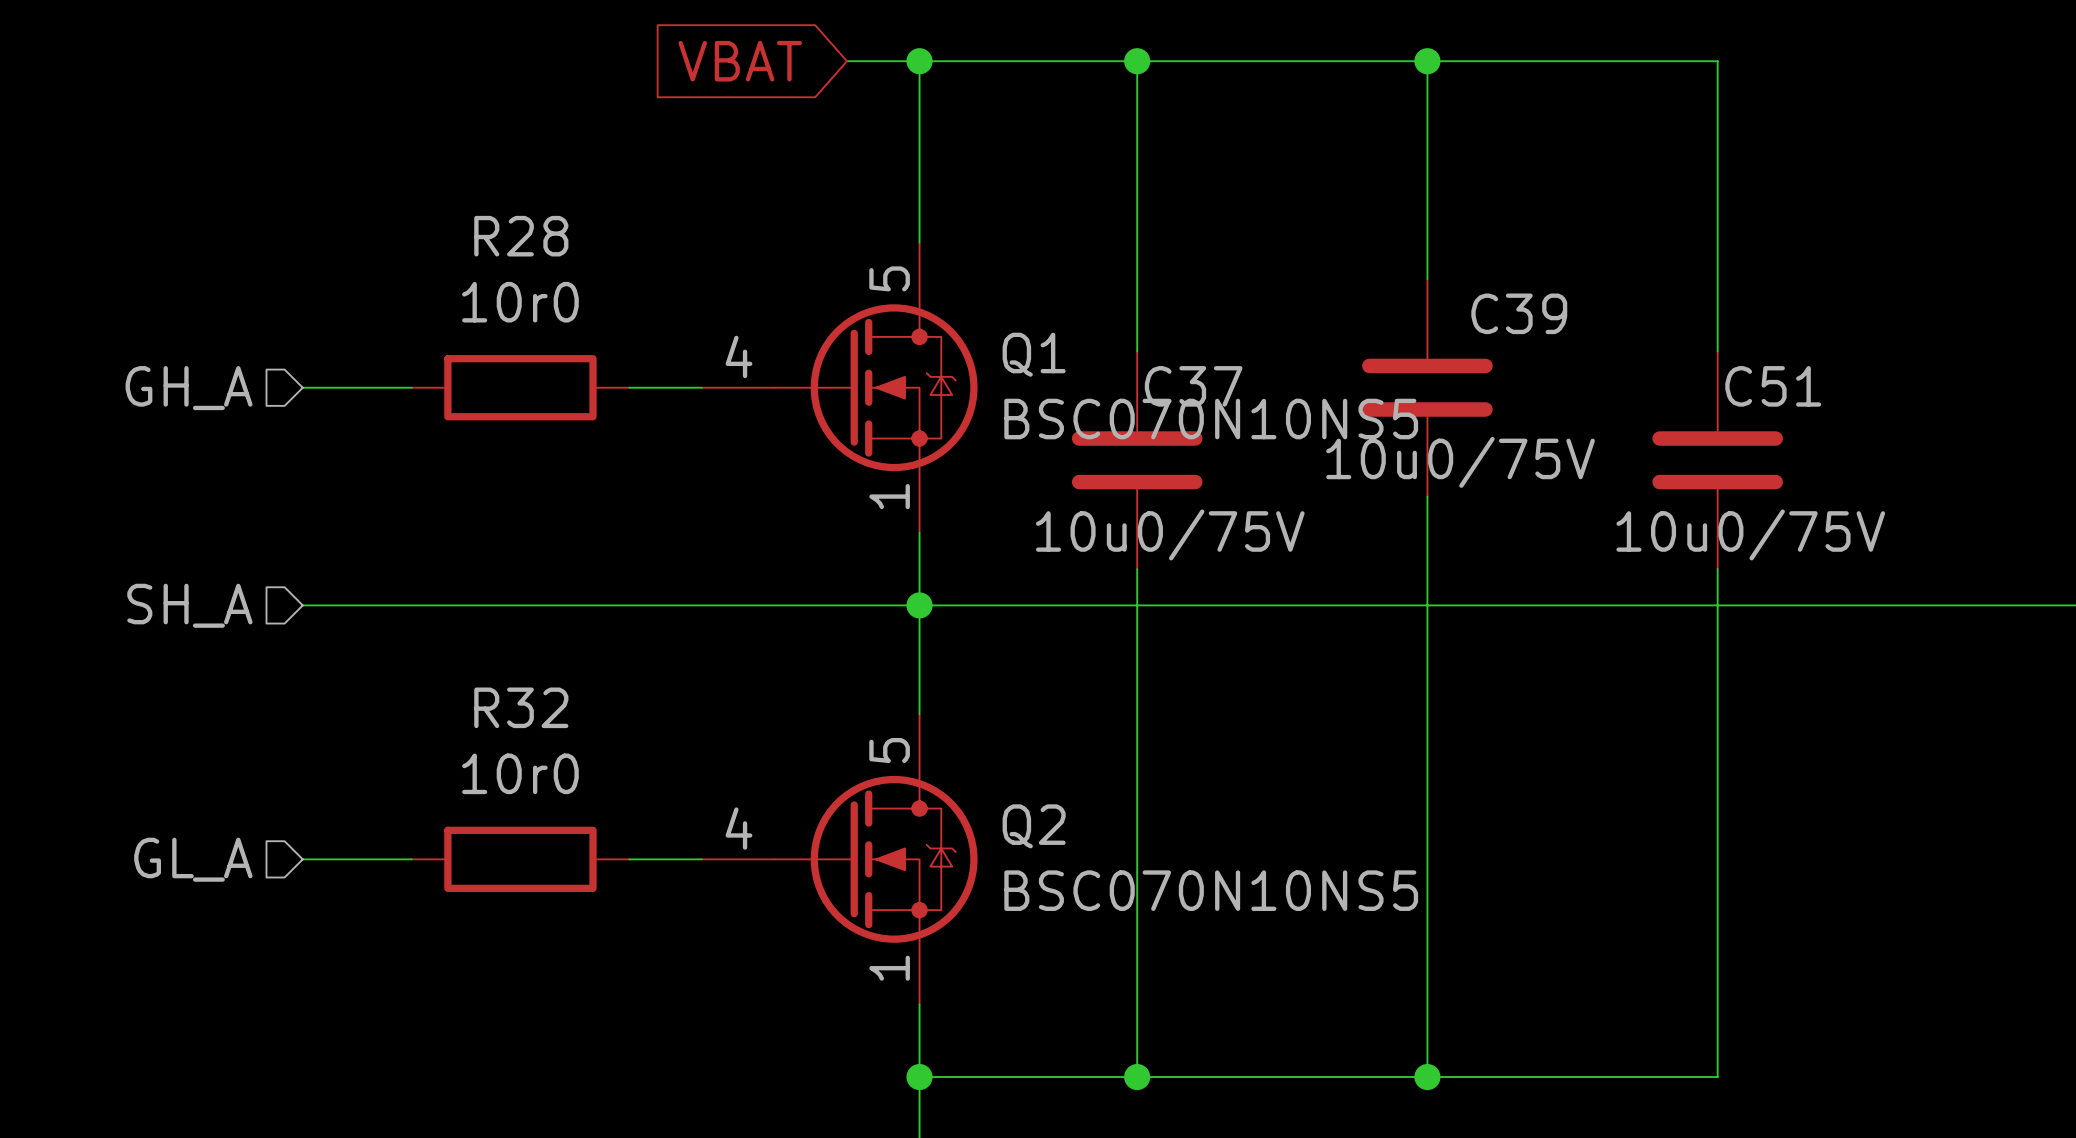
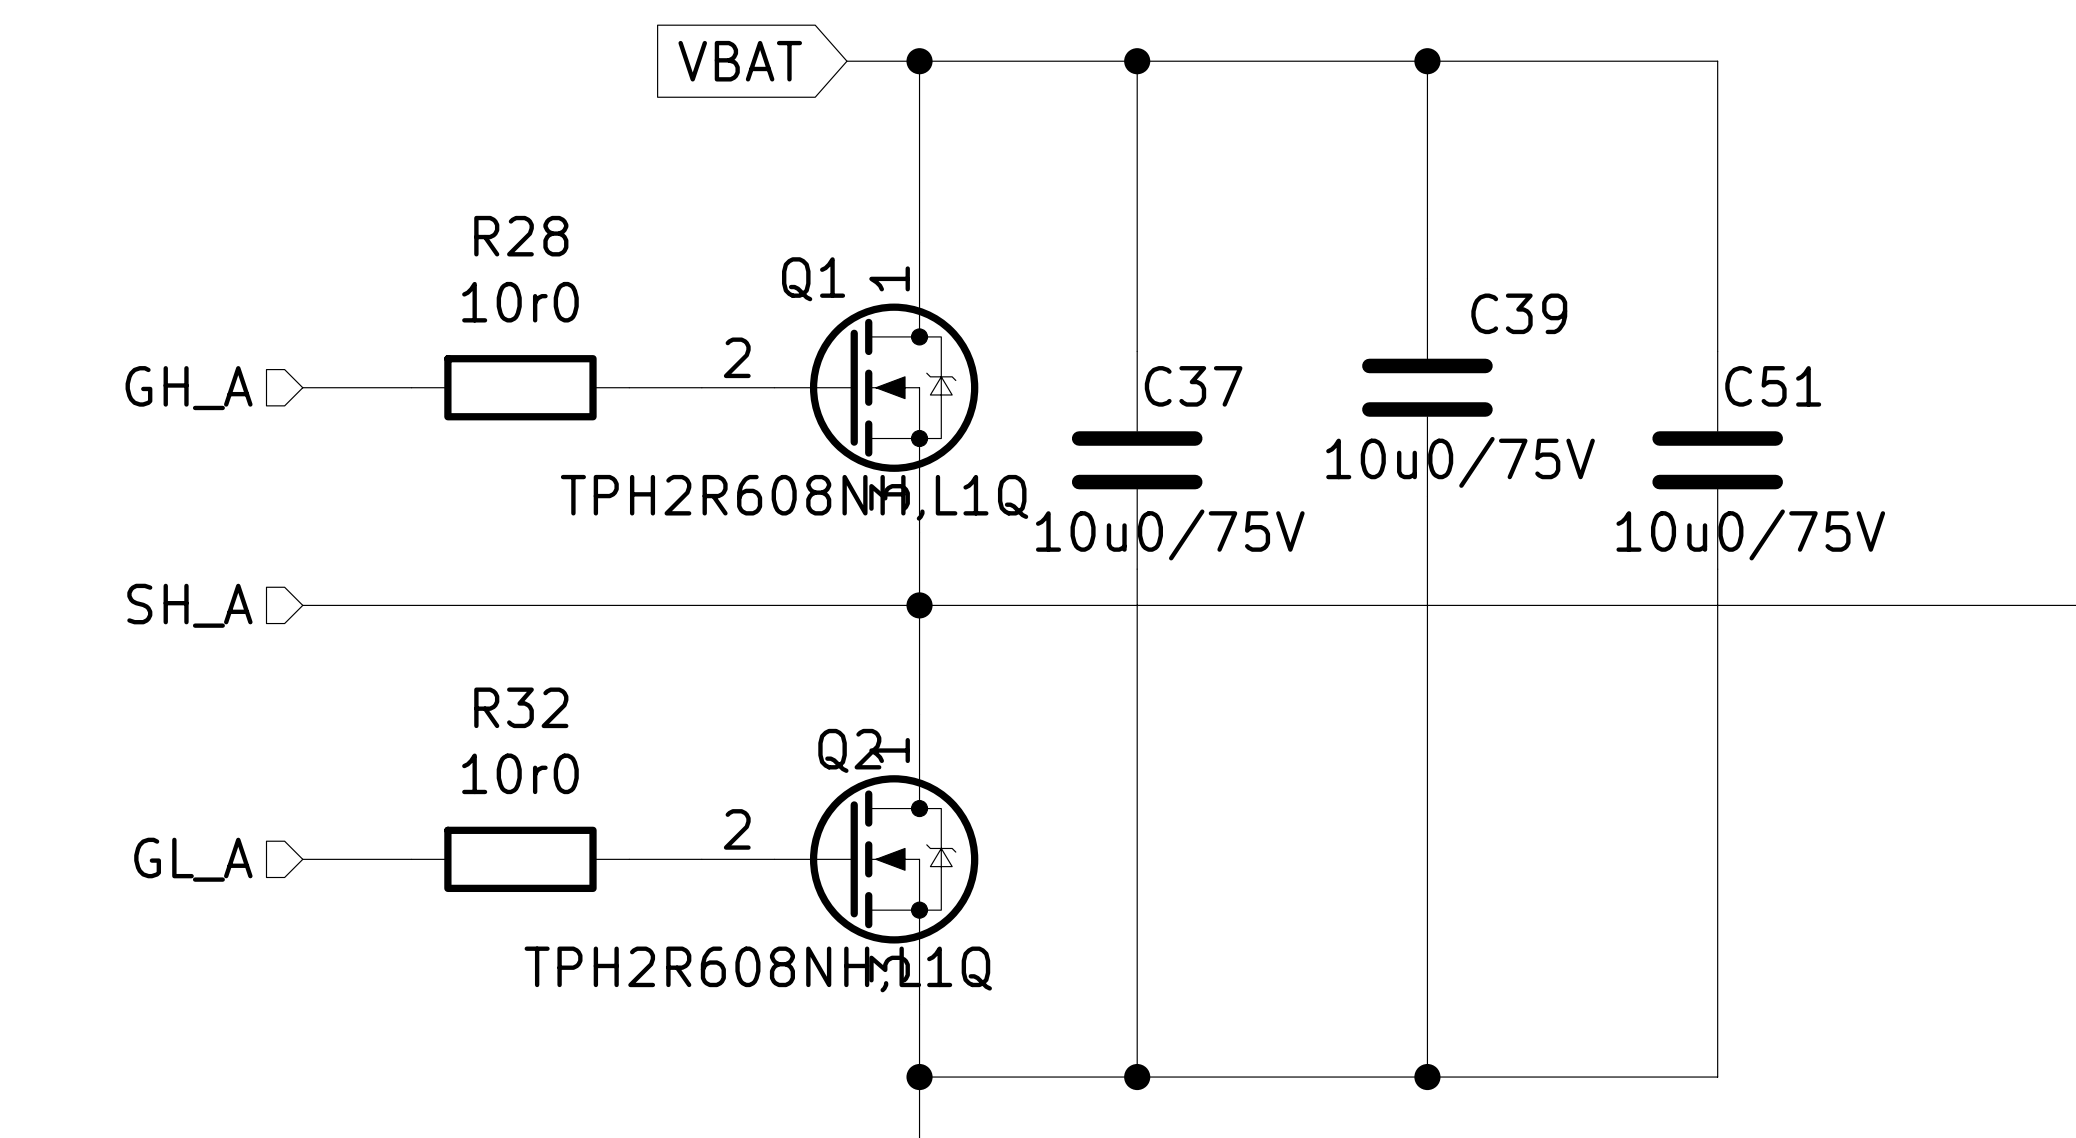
Q1 symbol: [701, 242, 978, 533] -> [701, 242, 979, 533]
Q1 name position: Q1 (1034, 354) -> Q1 (813, 279)
Q1 value: BSC070N10NS5 (1211, 419) -> TPH2R608NH,L1Q (794, 497)
Q2 symbol: [701, 714, 978, 1005] -> [701, 714, 979, 1005]
Q2 name position: Q2 (1034, 826) -> Q2 (849, 750)
Q2 value: BSC070N10NS5 (1211, 890) -> TPH2R608NH,L1Q (758, 969)

